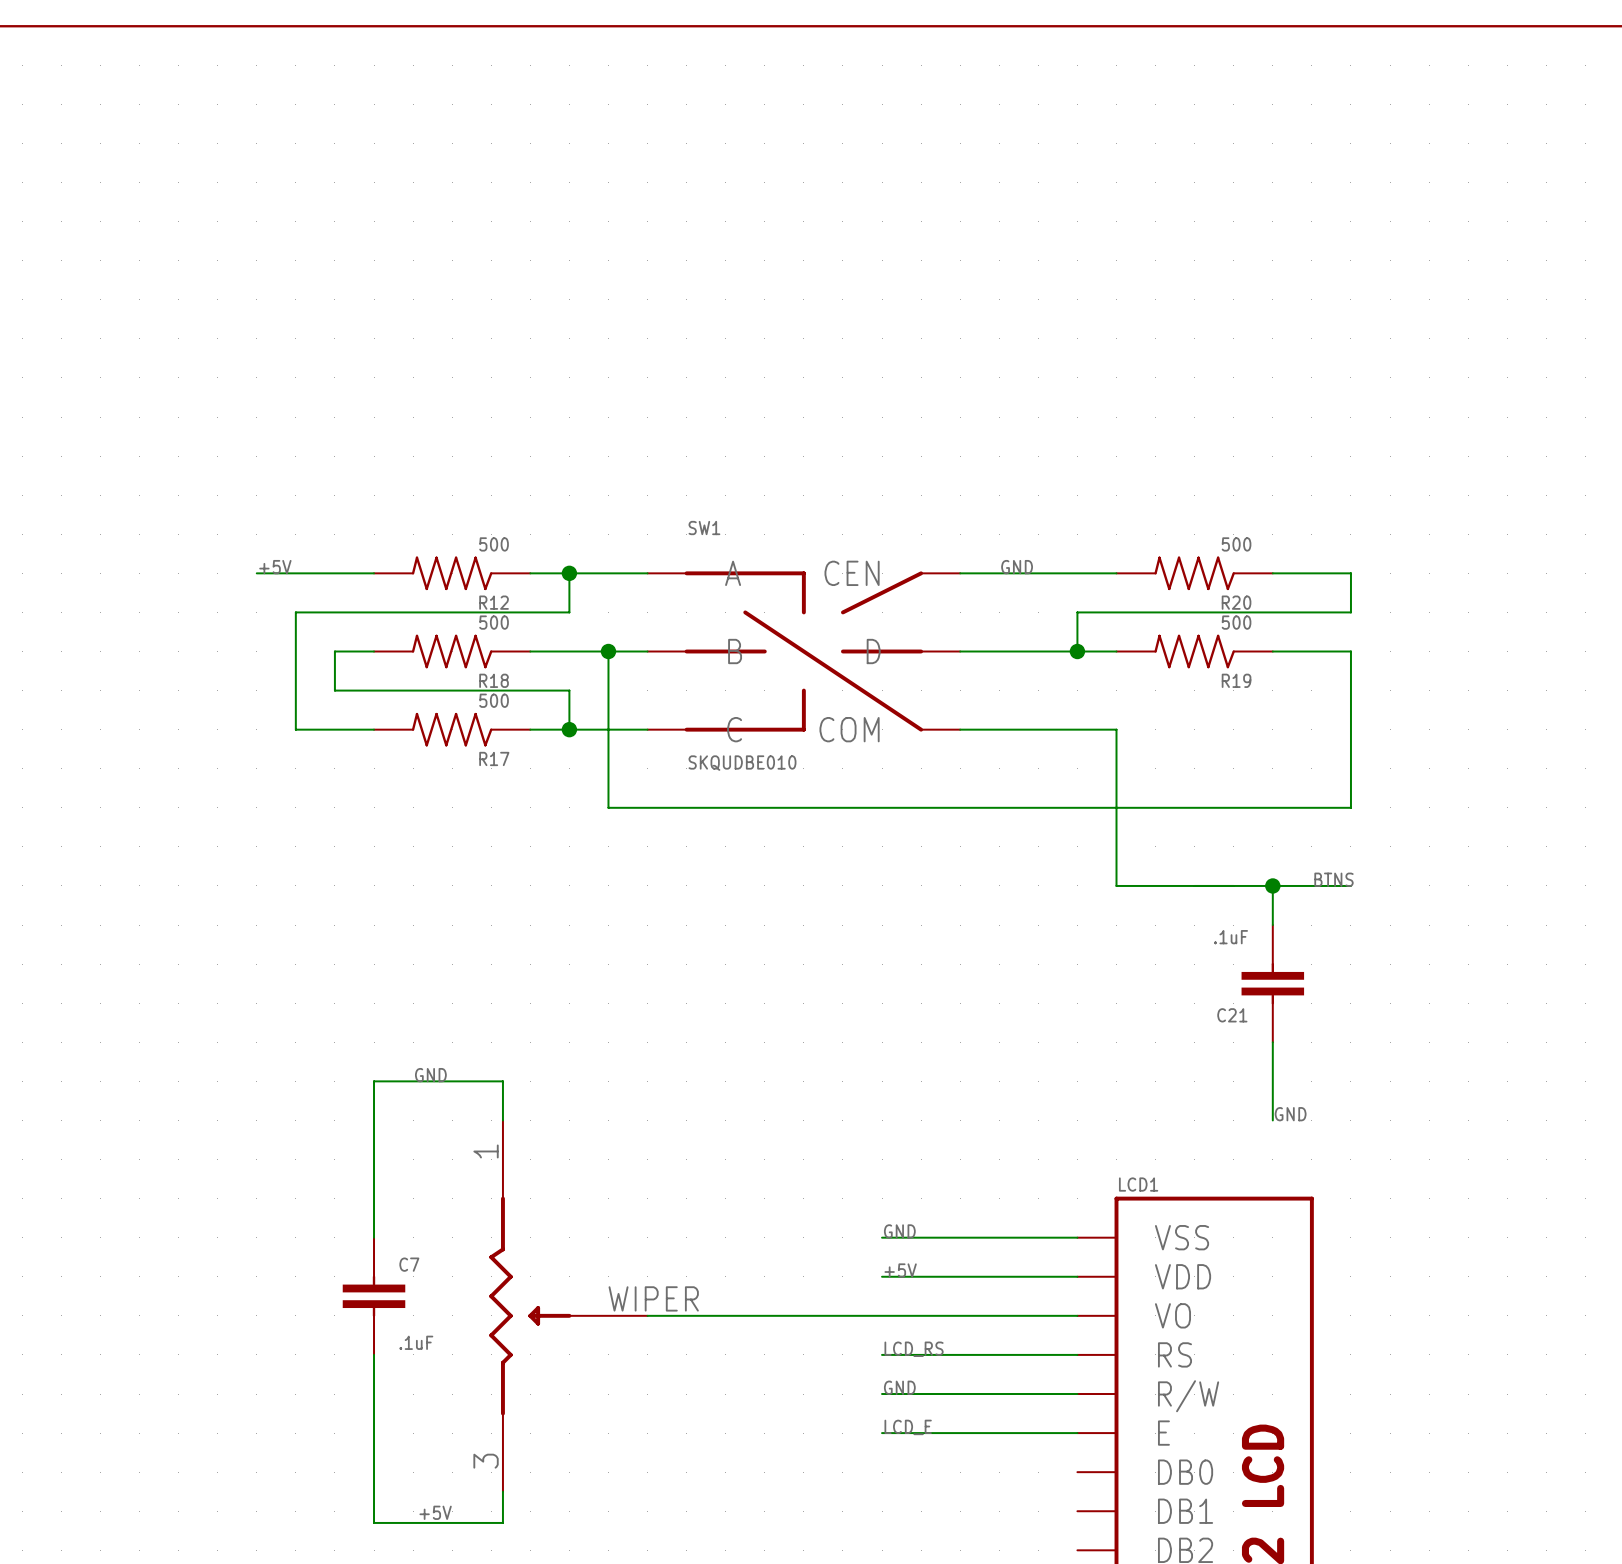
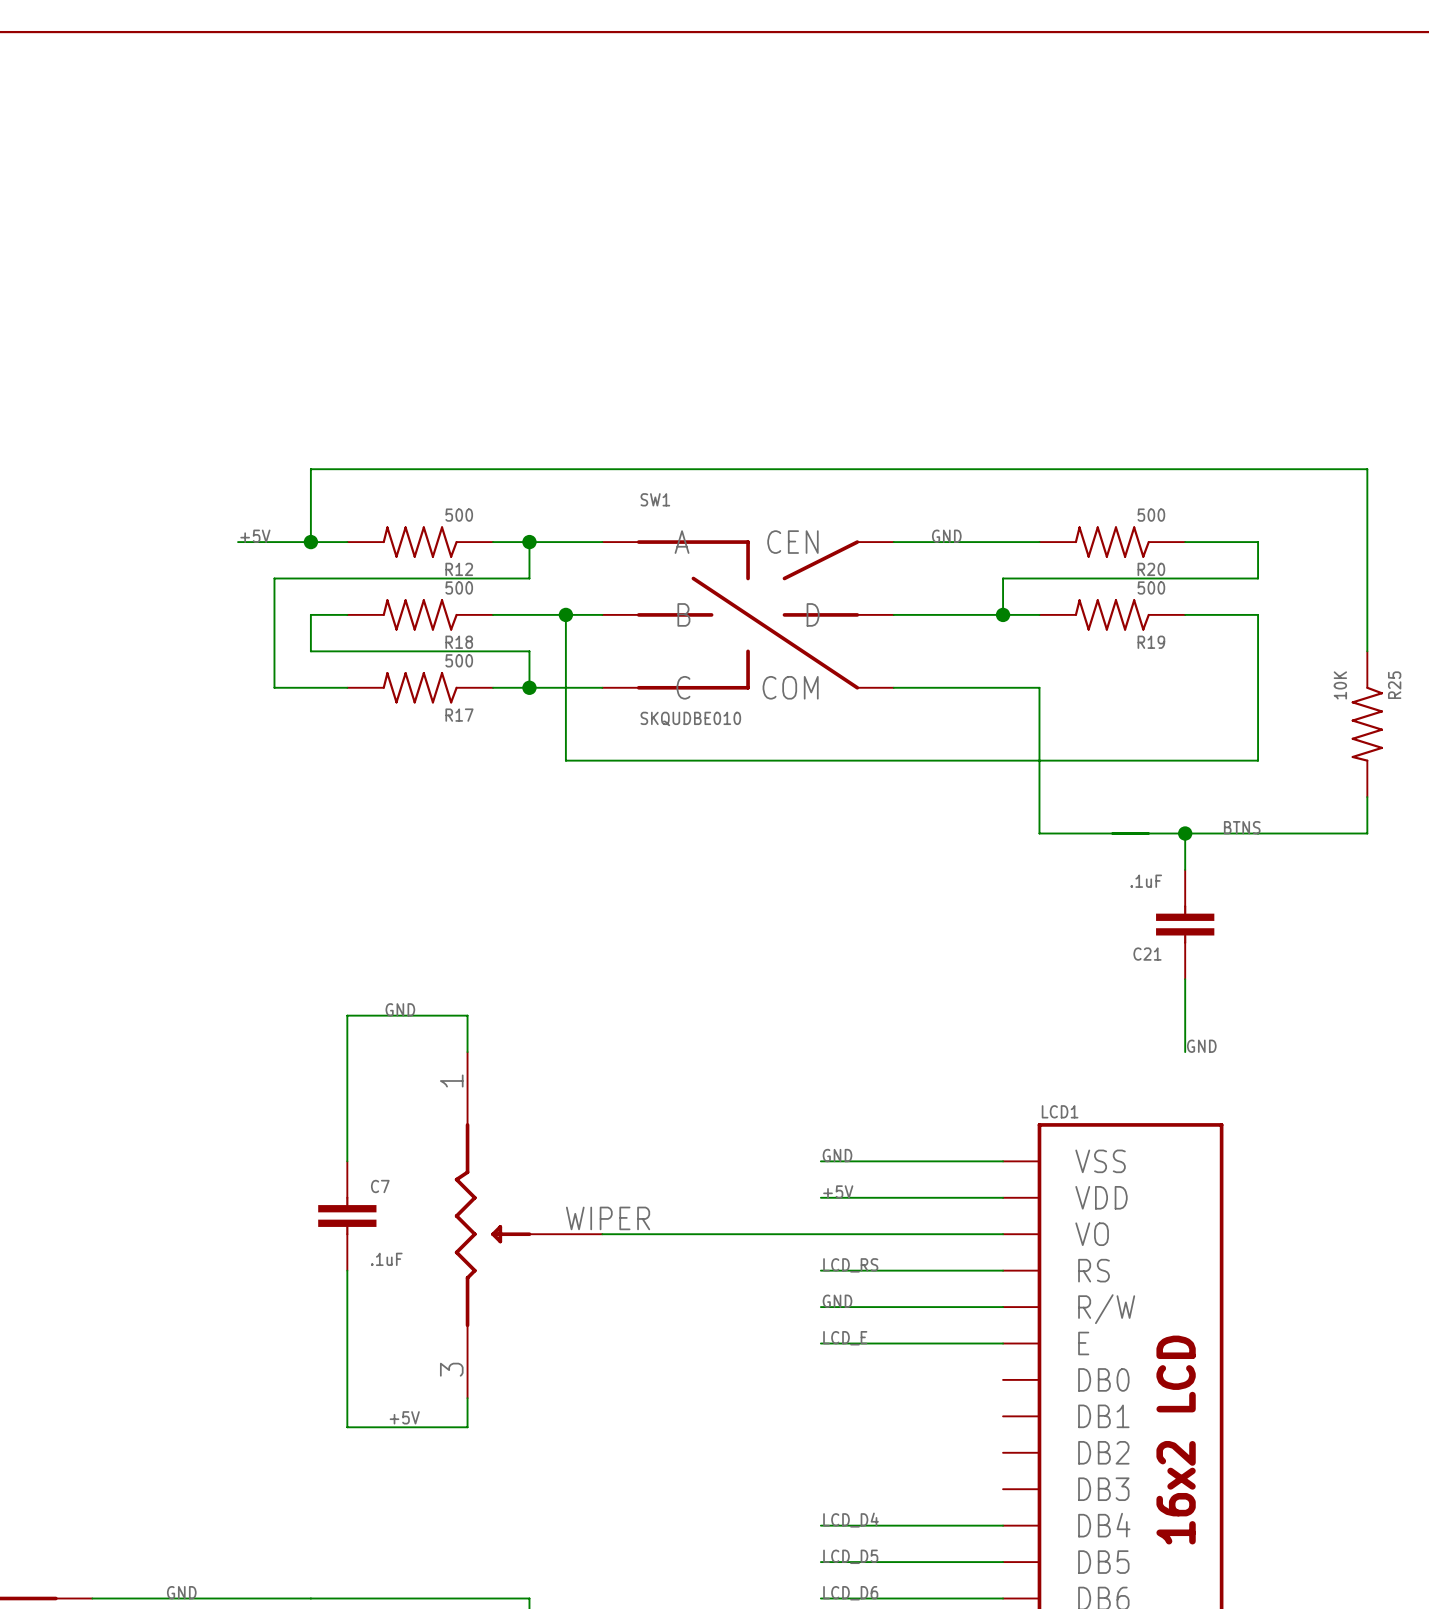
wire: none -> (310, 542) (310, 469) (1367, 469) (1367, 651)
junction: none -> (310, 542)
R25: none -> 10K (1367, 724)
wire: none -> (1367, 797) (1367, 833) (1258, 833)

